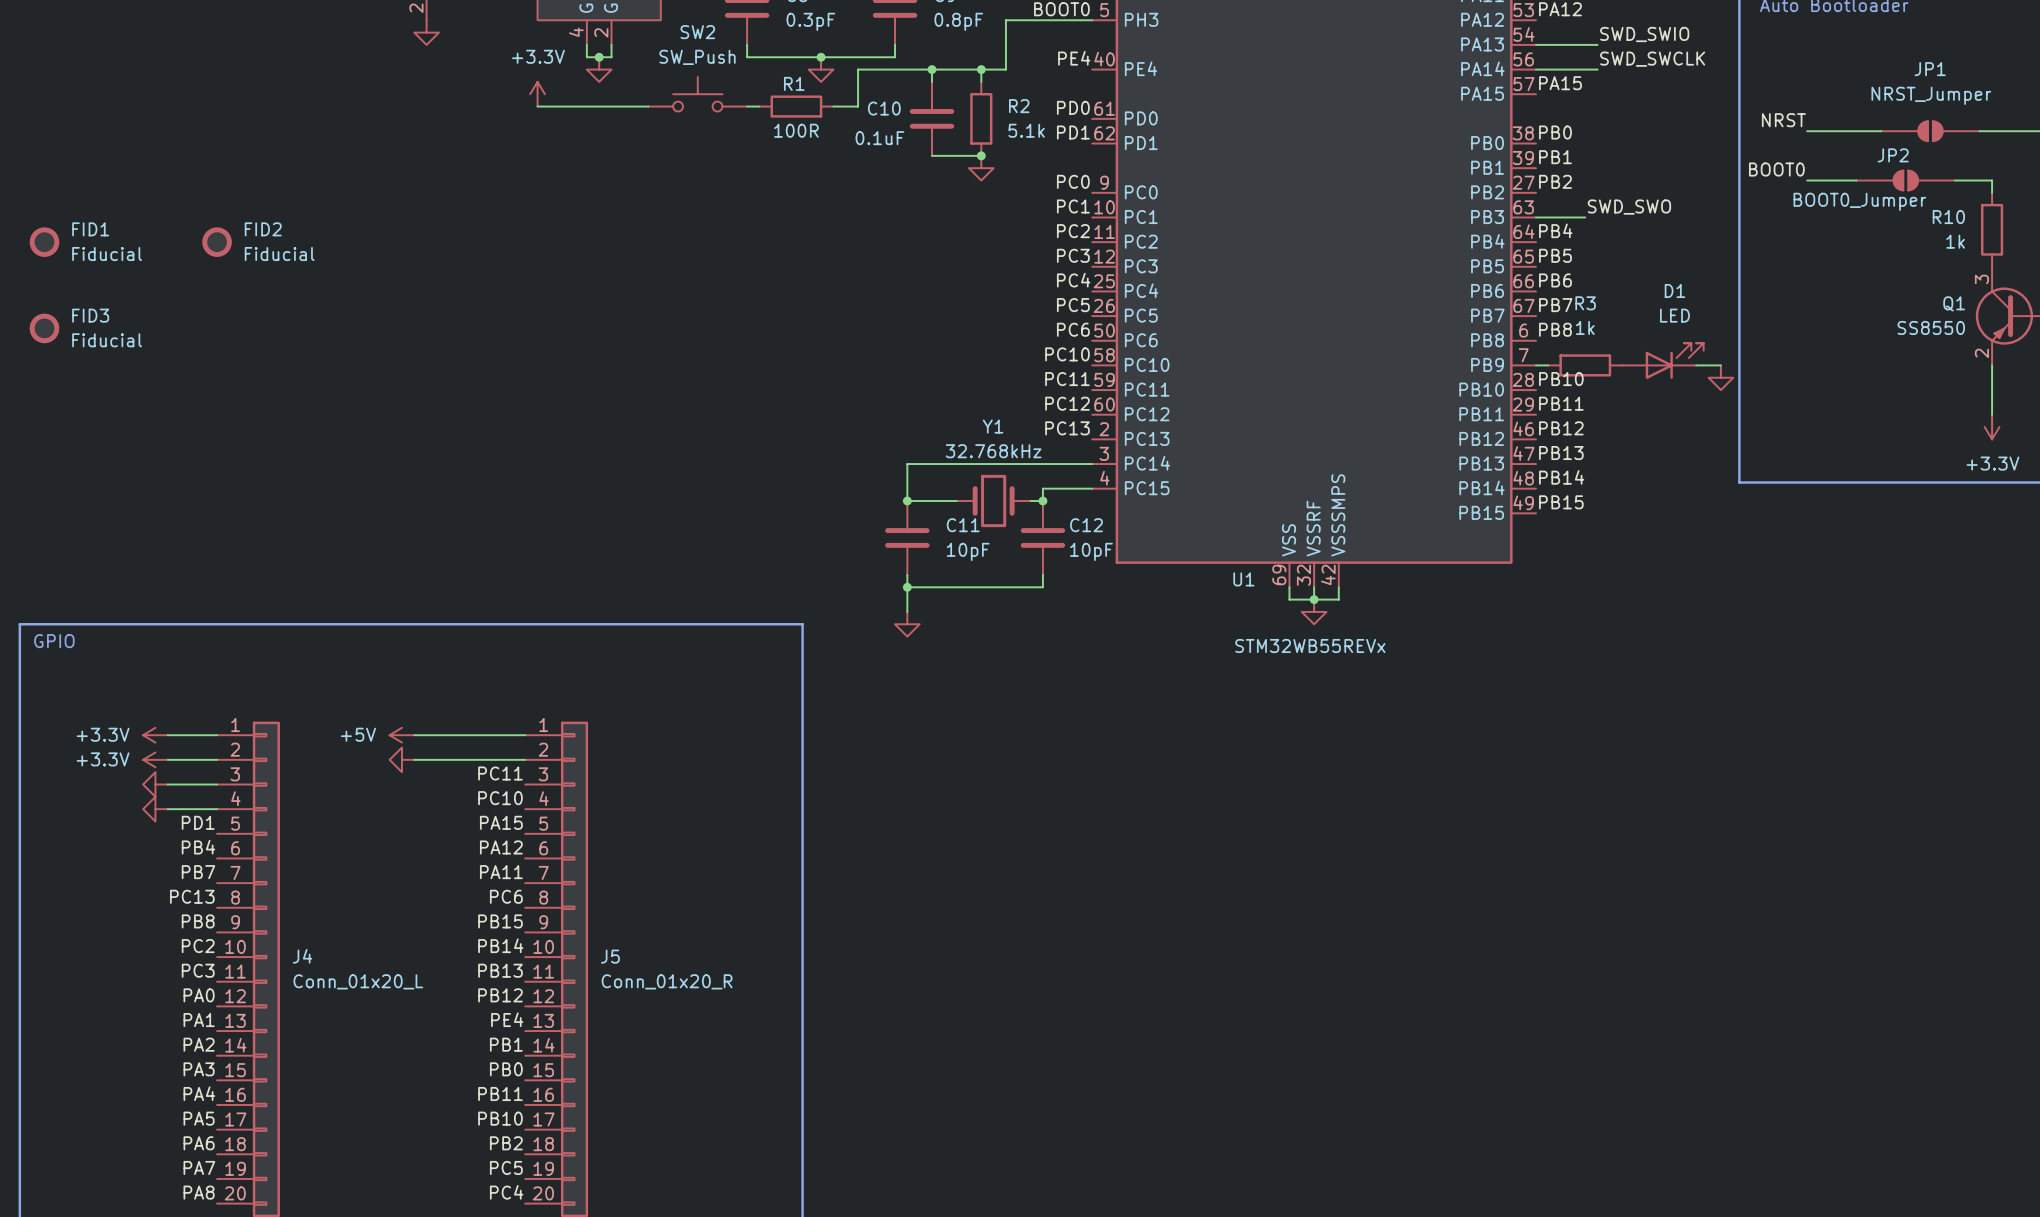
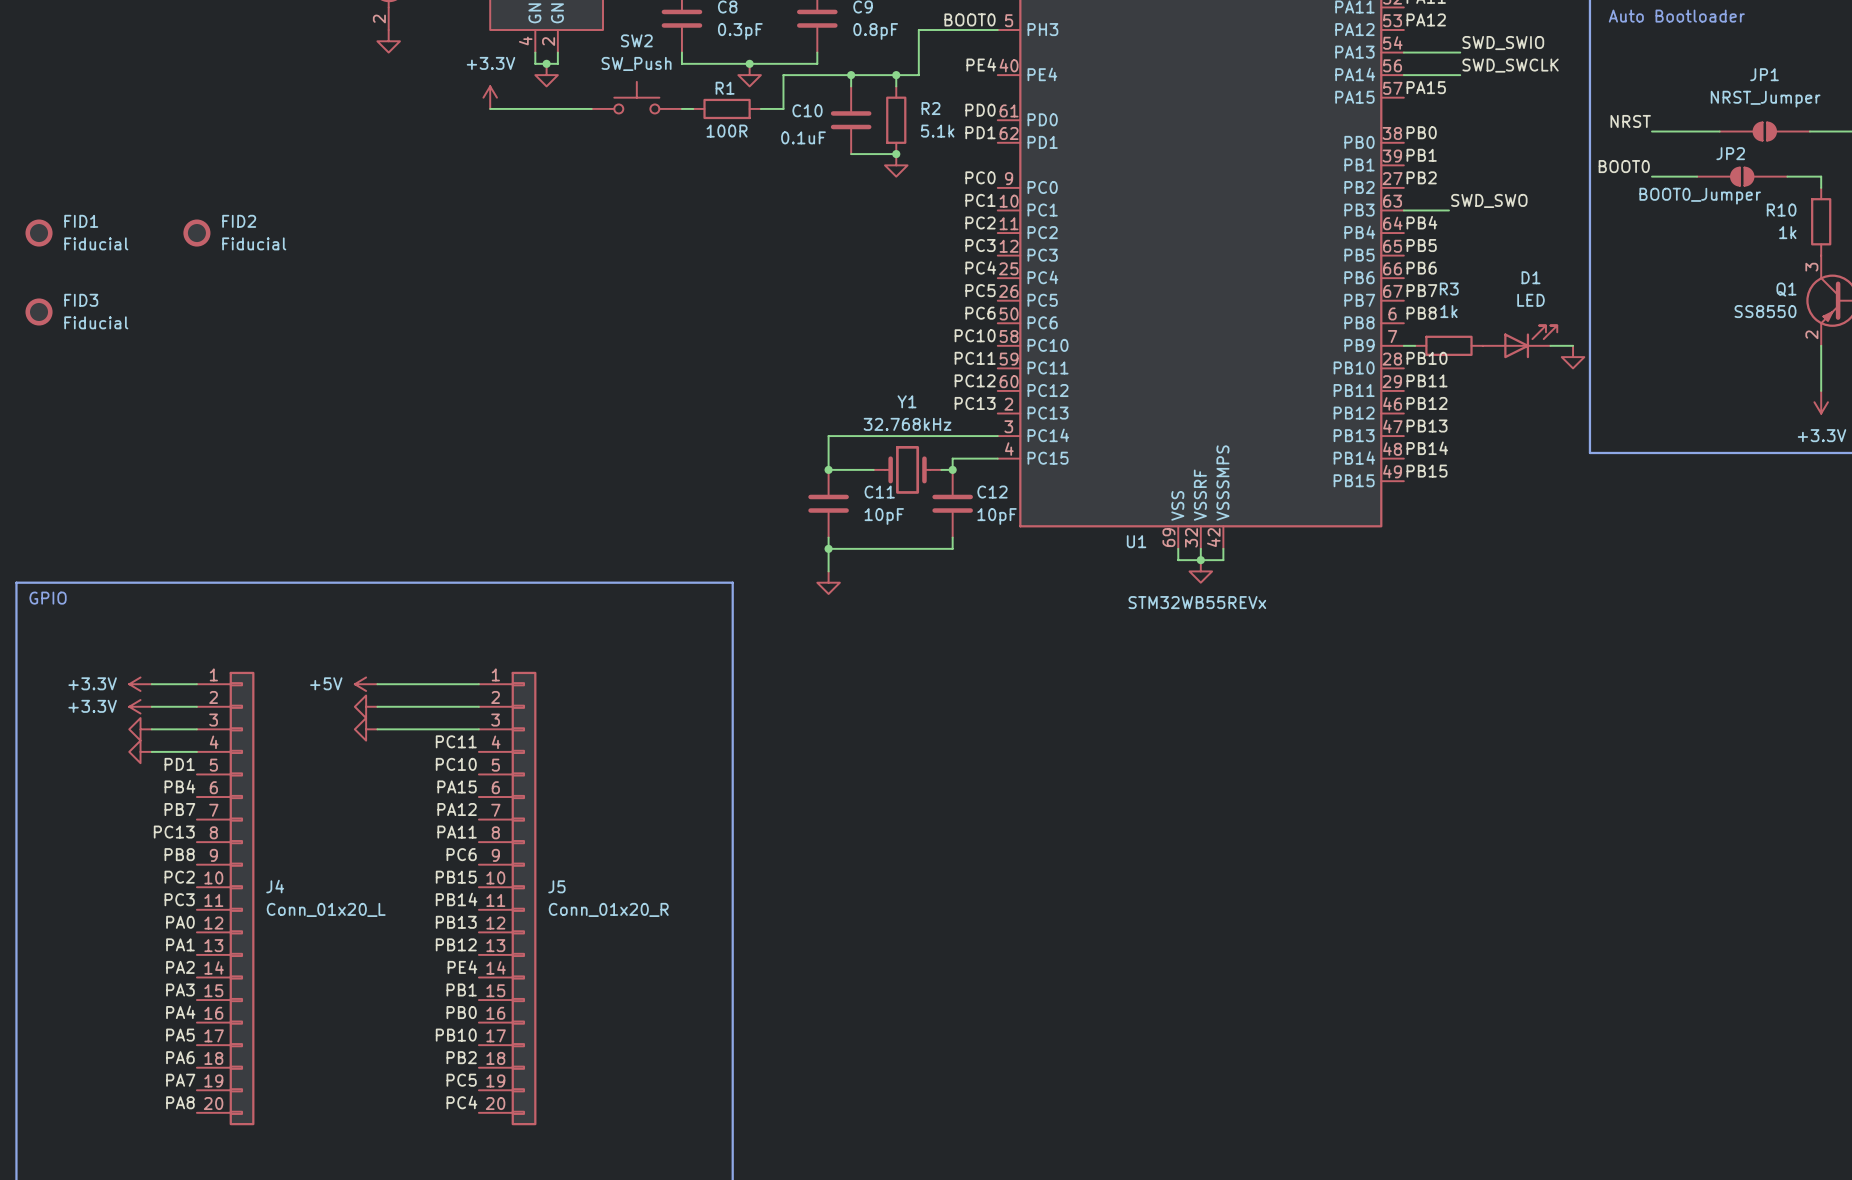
label: PC11 (500, 773) -> none
power symbol: none -> (366, 729)
wire: none -> (377, 729) (478, 729)
label: PC10 (500, 798) -> PC11 (456, 741)
label: PA15 (501, 822) -> PC10 (456, 764)
label: PA12 (501, 847) -> PA15 (457, 786)
label: PA11 (501, 872) -> PA12 (457, 809)
label: PC6 (506, 896) -> PA11 (457, 832)
label: PB15 (500, 921) -> PC6 (461, 854)
label: PB14 (500, 945) -> PB15 (456, 877)
label: PB13 (500, 970) -> PB14 (456, 899)
label: PB12 (500, 995) -> PB13 (456, 922)
label: PE4 (507, 1019) -> PB12 (456, 944)
label: PB1 (506, 1044) -> PE4 (462, 967)
label: PB0 (506, 1069) -> PB1 (461, 989)
label: PB11 (500, 1093) -> PB0 (461, 1012)

